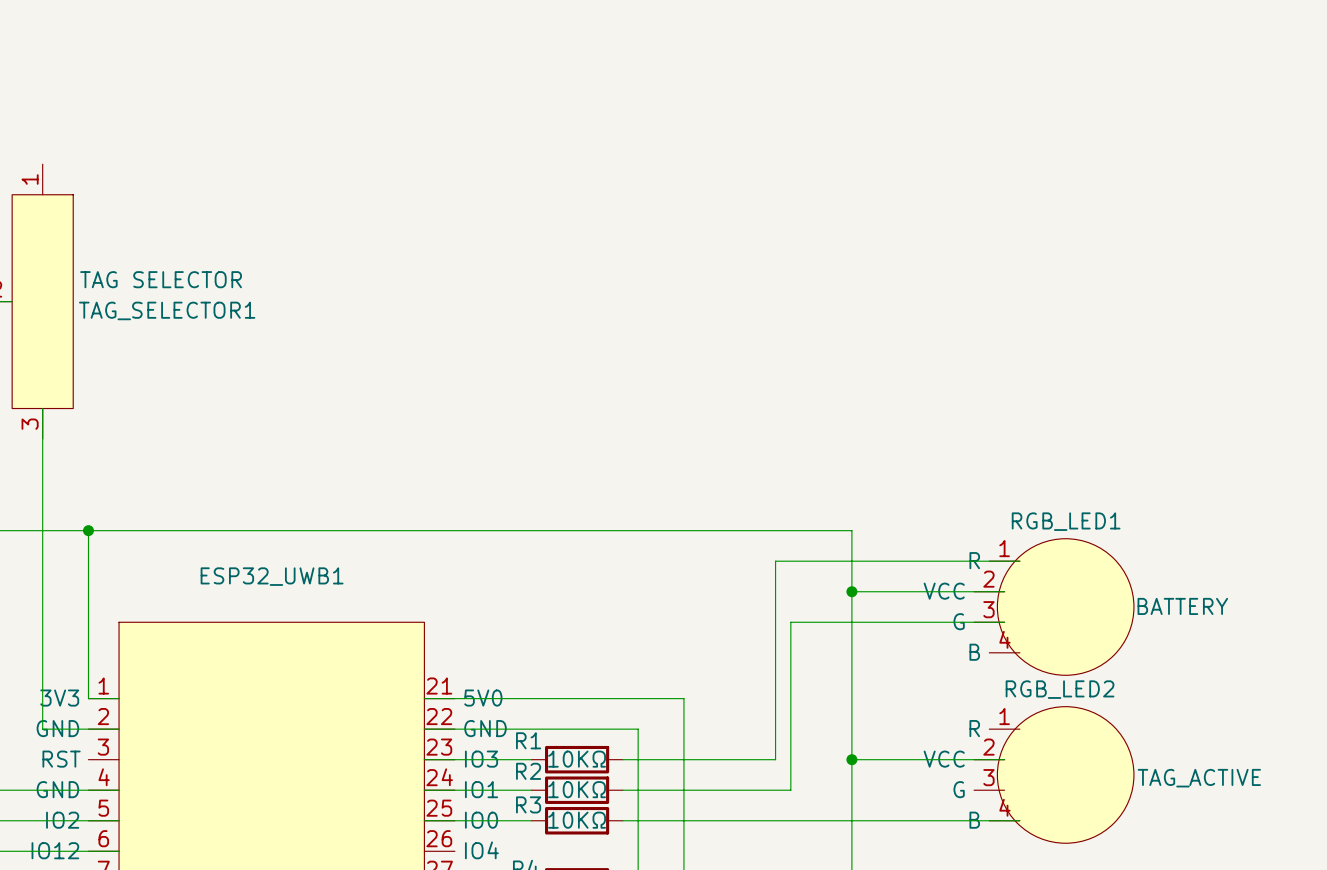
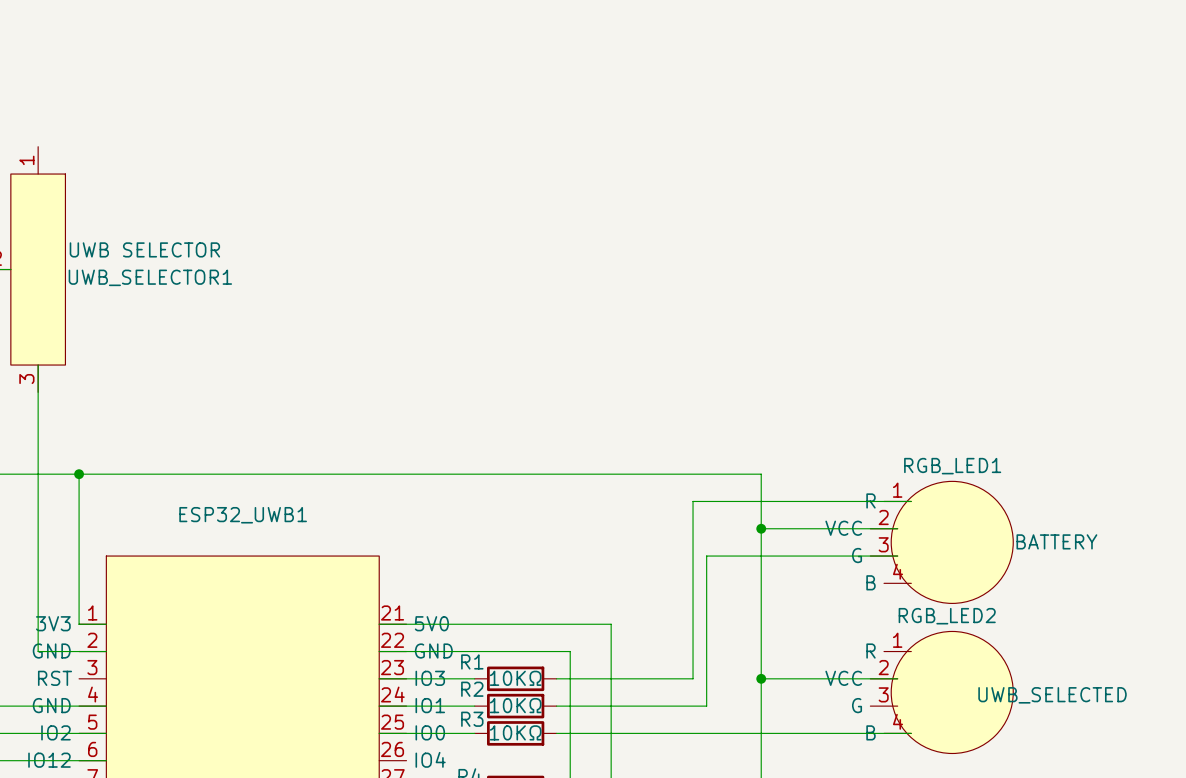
TAG_SELECTOR1 value: TAG SELECTOR (161, 279) -> UWB SELECTOR (144, 249)
TAG_SELECTOR1 name: TAG_SELECTOR1 (167, 310) -> UWB_SELECTOR1 (150, 277)
RGB_LED2 value: TAG_ACTIVE (1199, 778) -> UWB_SELECTED (1052, 695)

